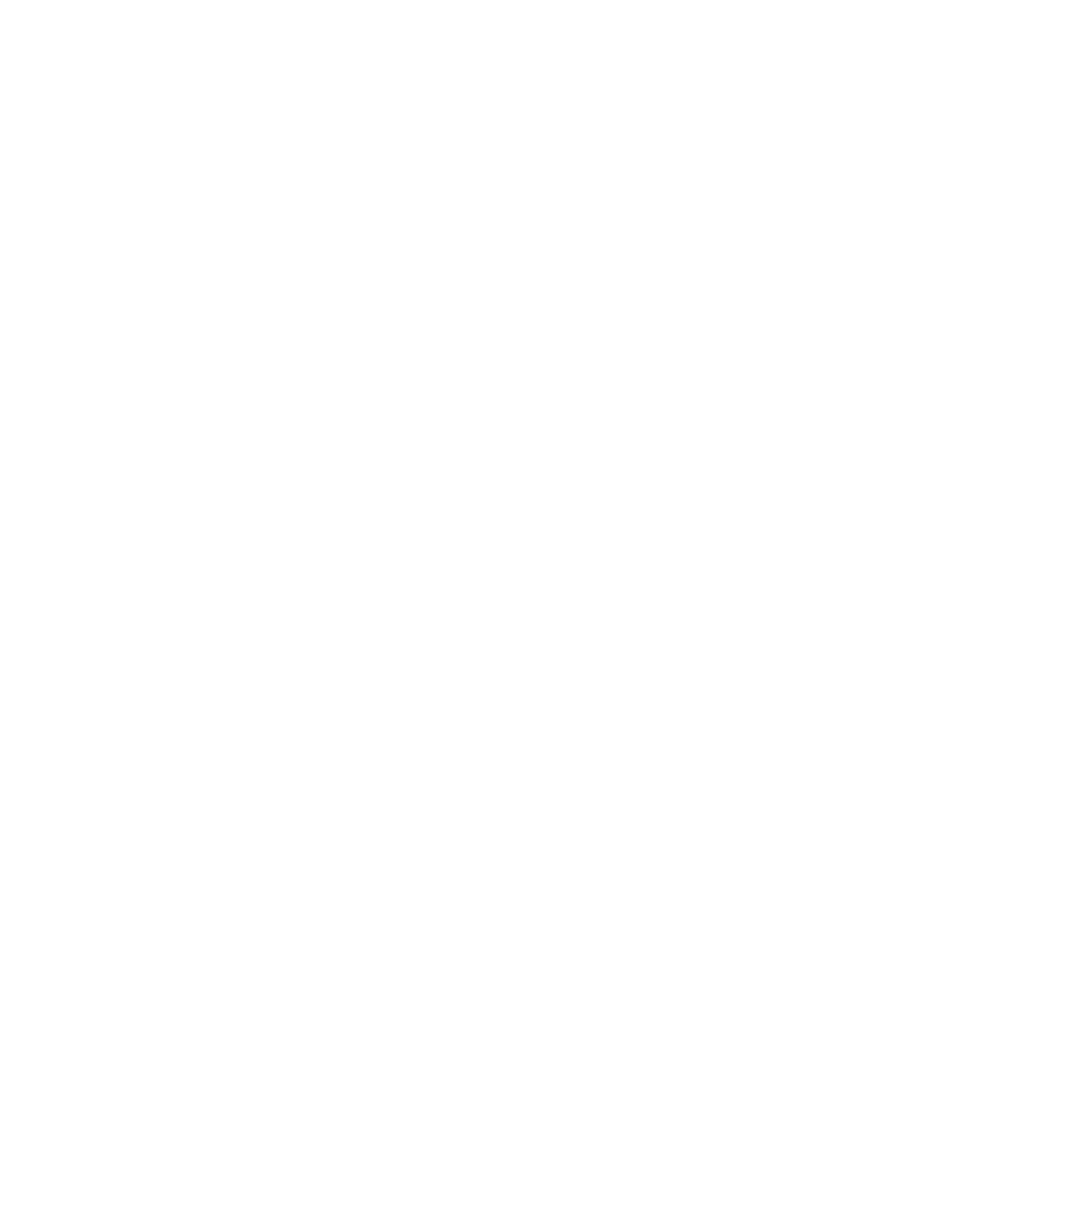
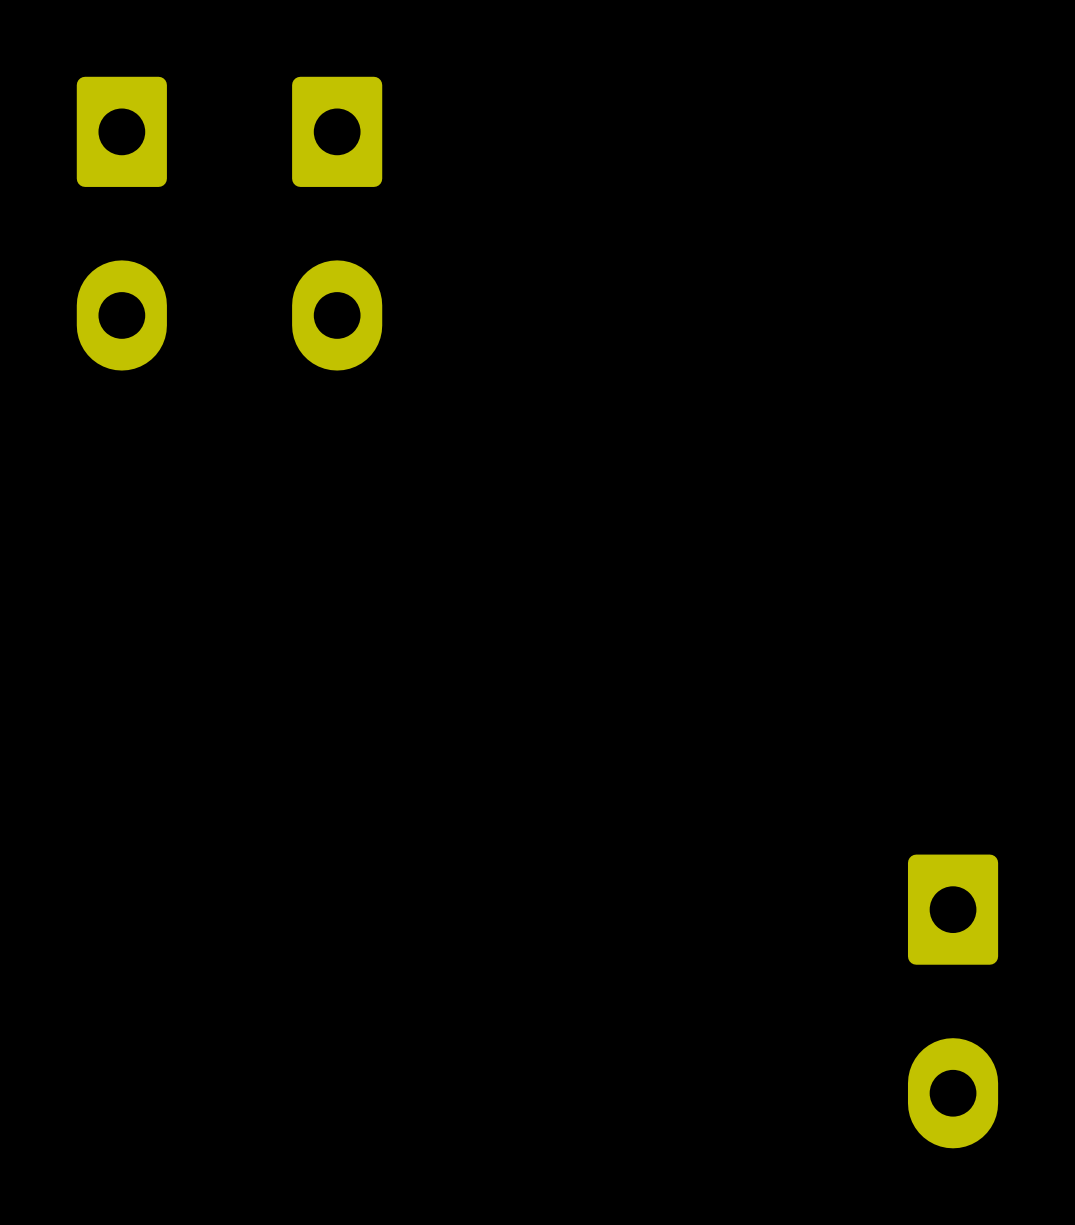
part: none -> (121, 223)
part: none -> (337, 223)
part: none -> (953, 1001)

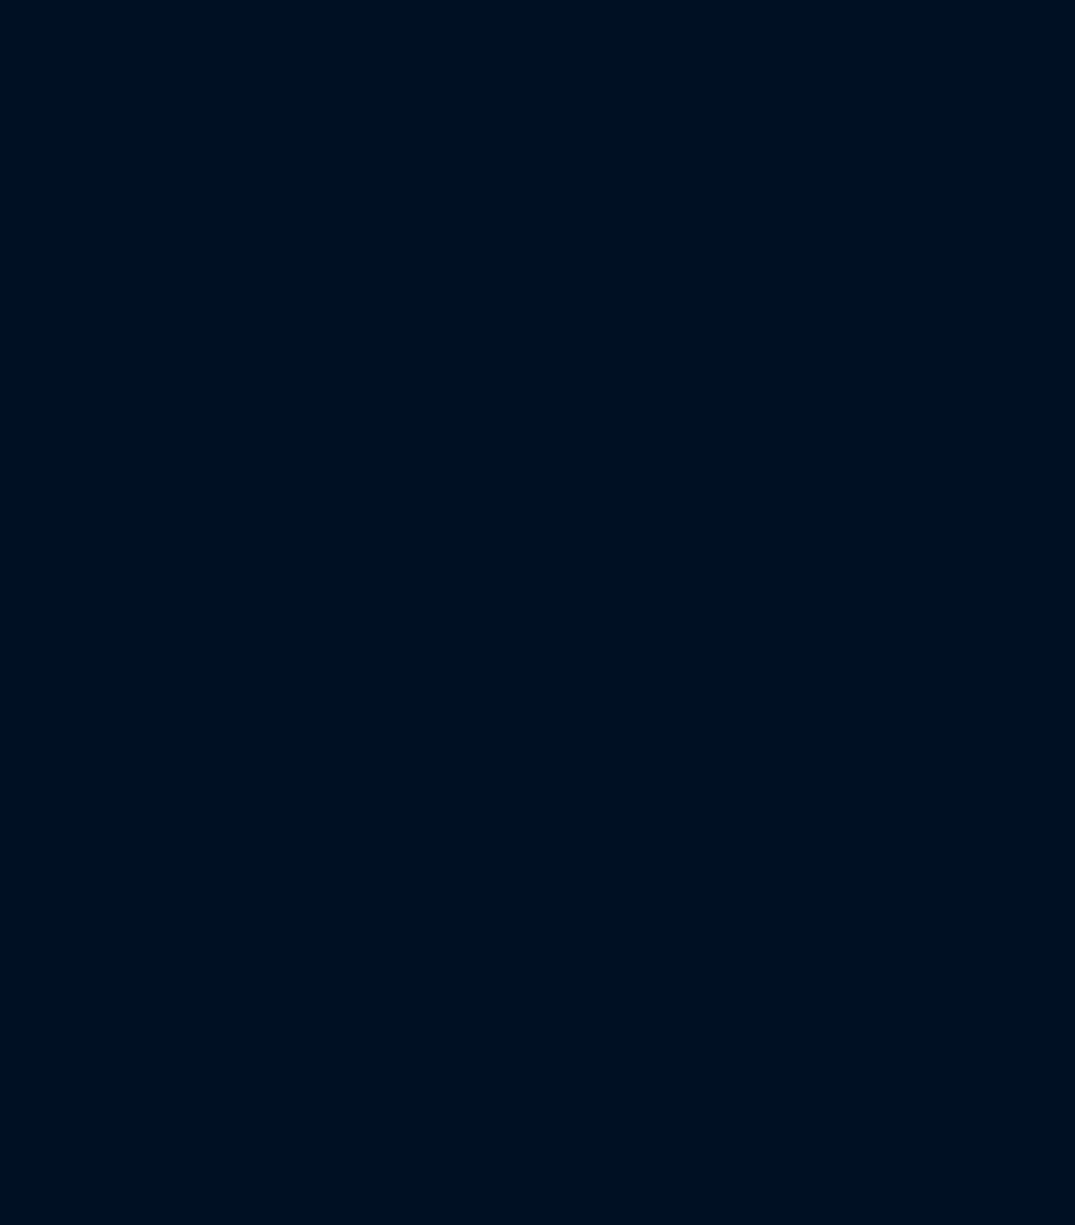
part: (121, 223) -> none
part: (337, 223) -> none
part: (953, 1001) -> none

